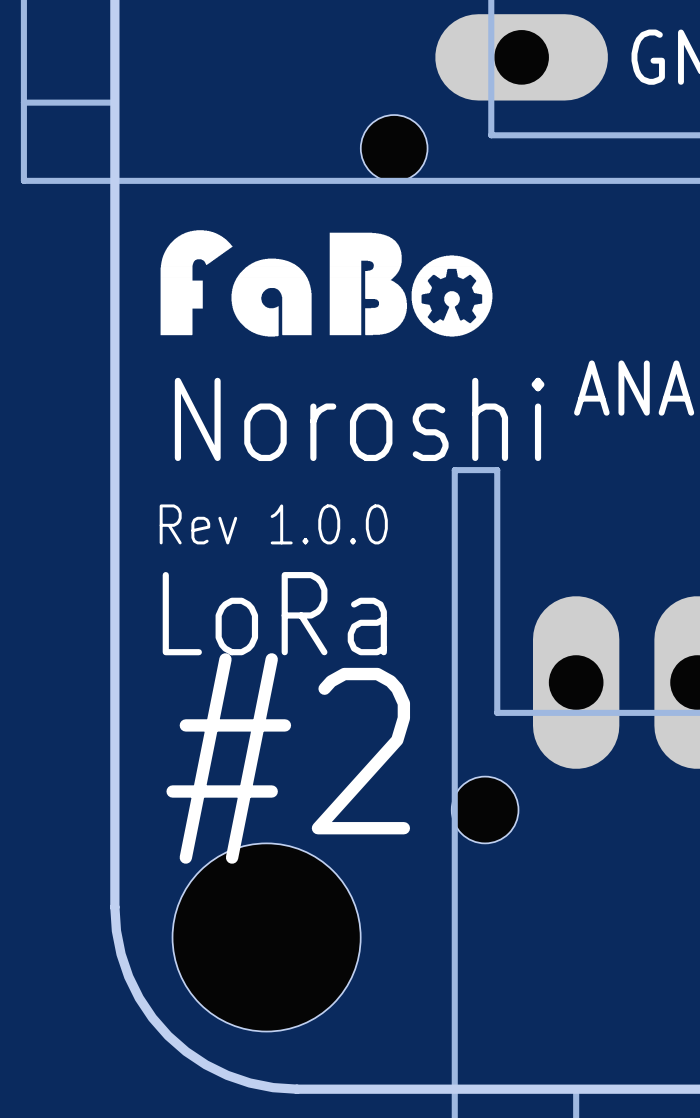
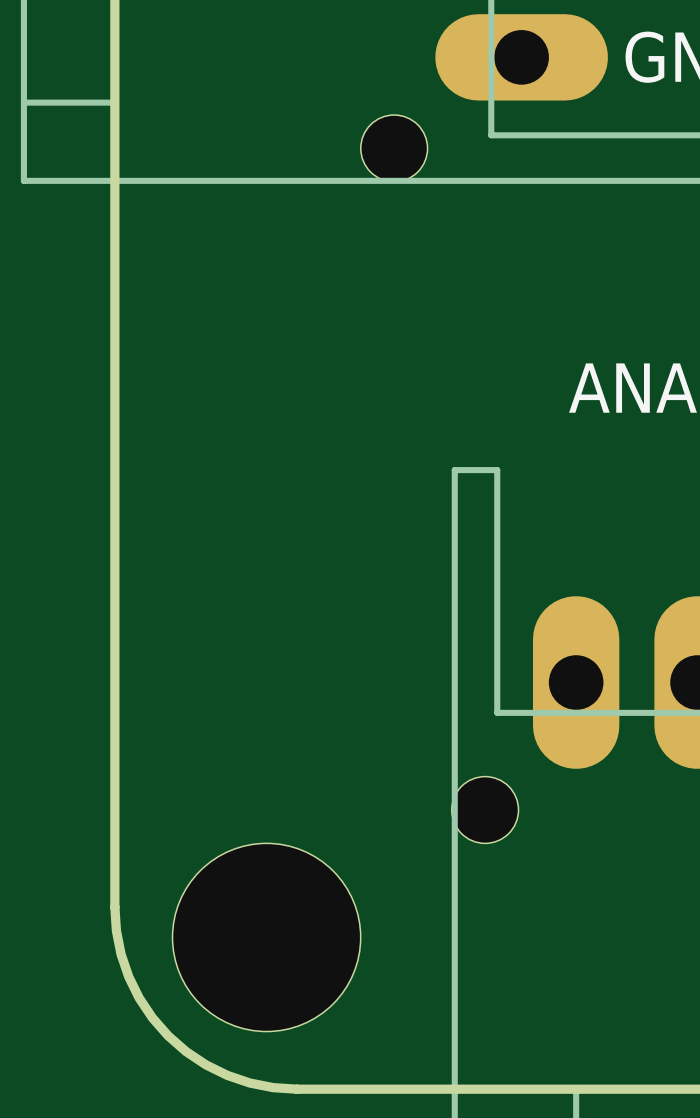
drawing: [160, 230, 493, 337] -> none
text: Noroshi (359, 419) -> none
text: Rev 1.0.0 (273, 524) -> none
text: LoRa (274, 613) -> none
text: #2 (288, 758) -> none

